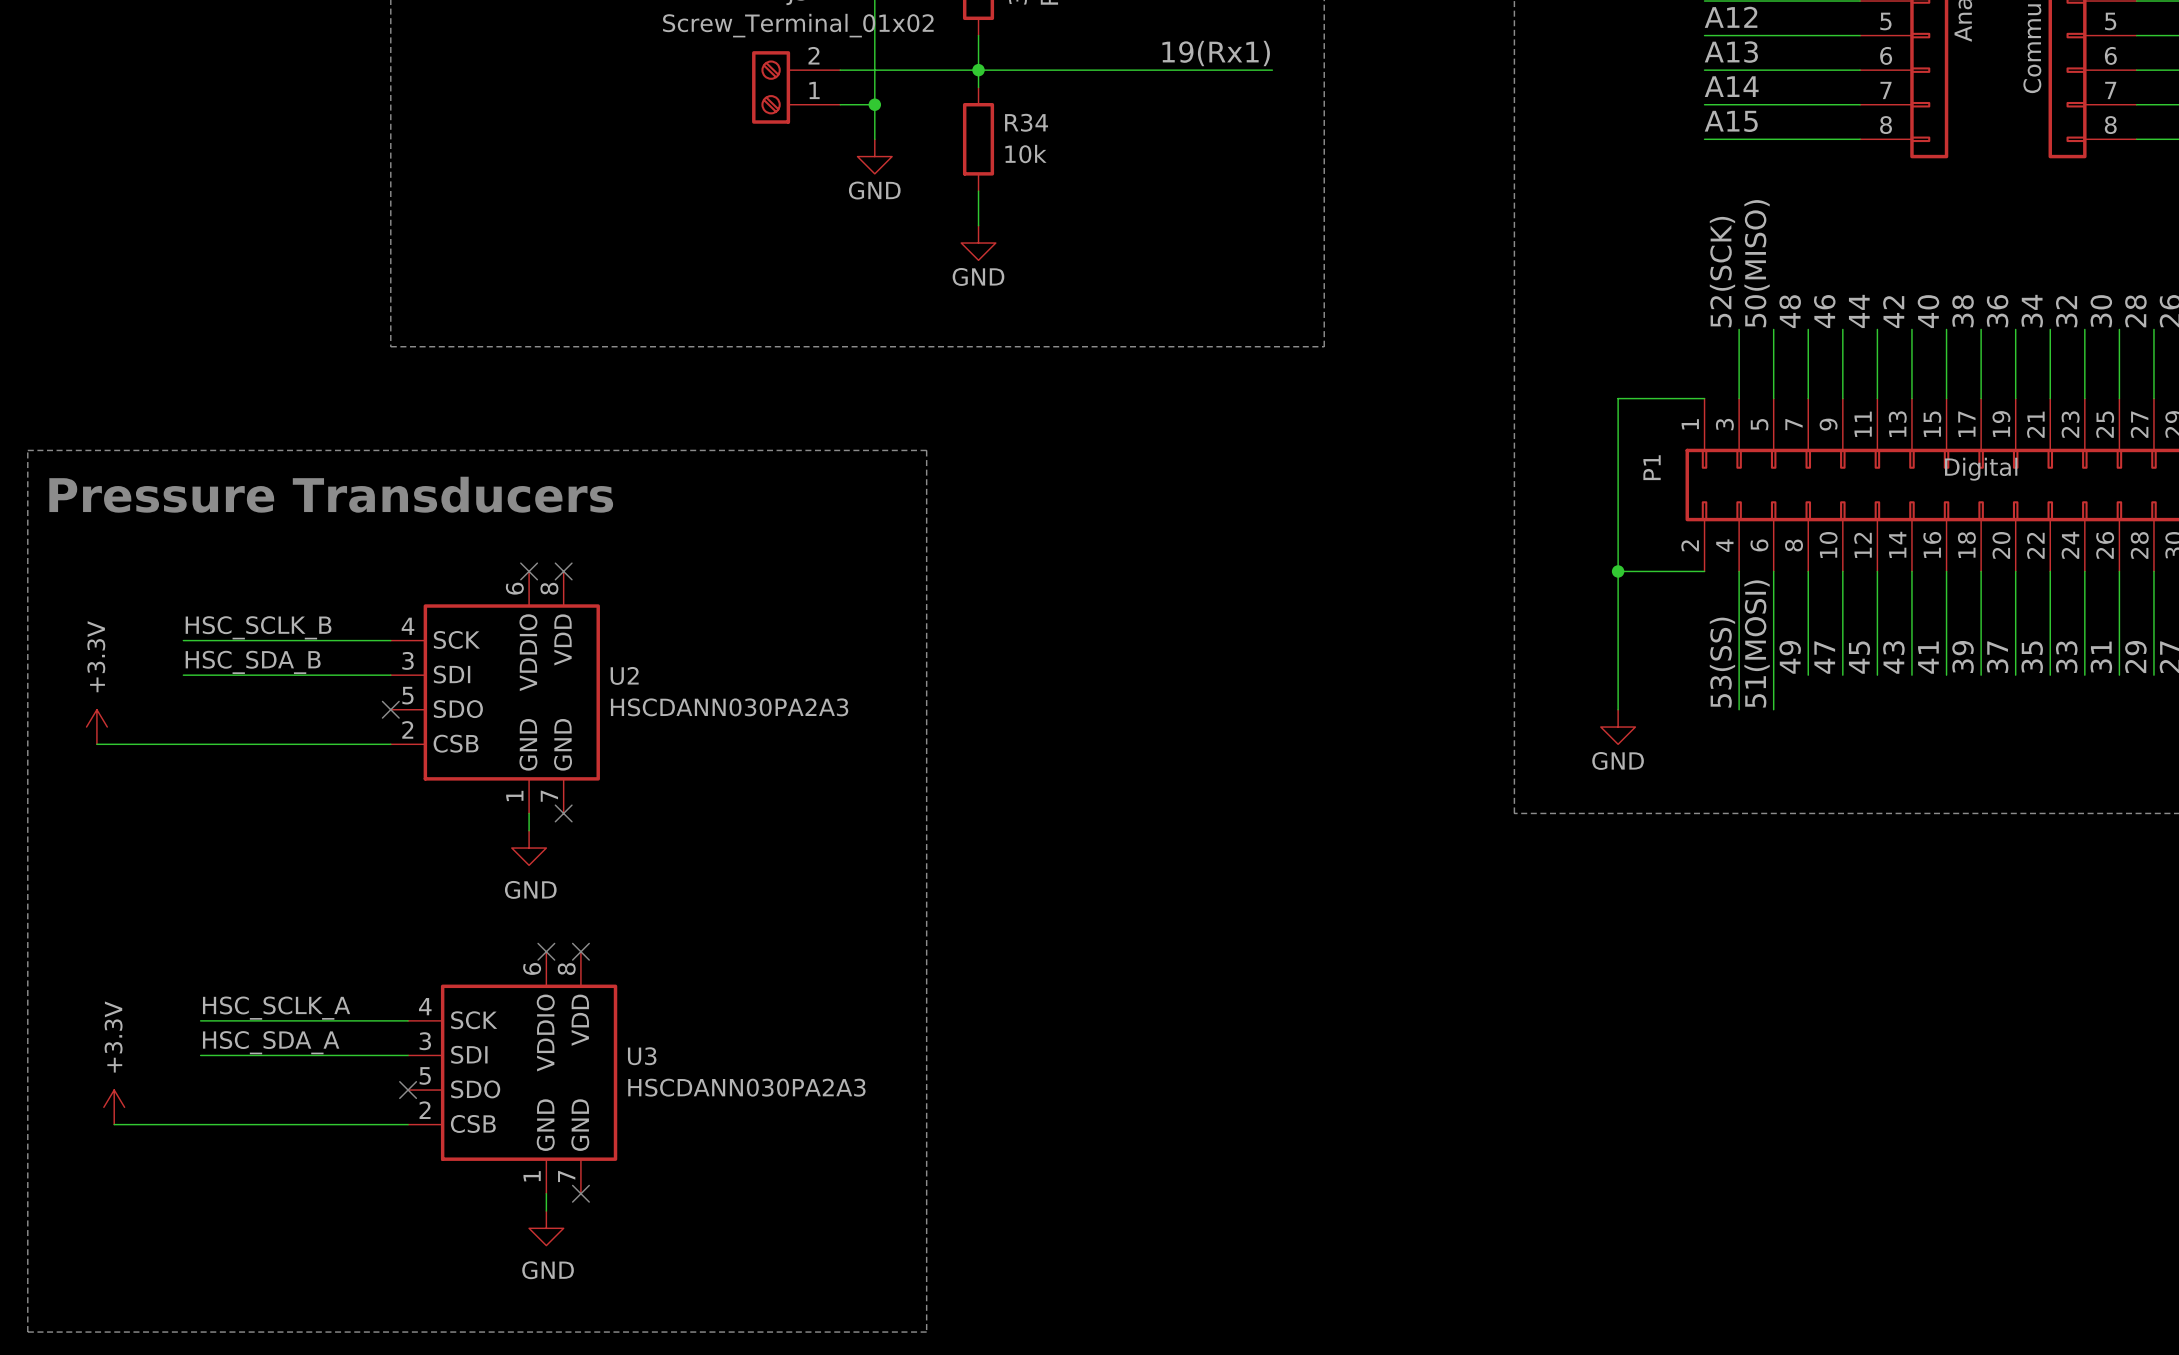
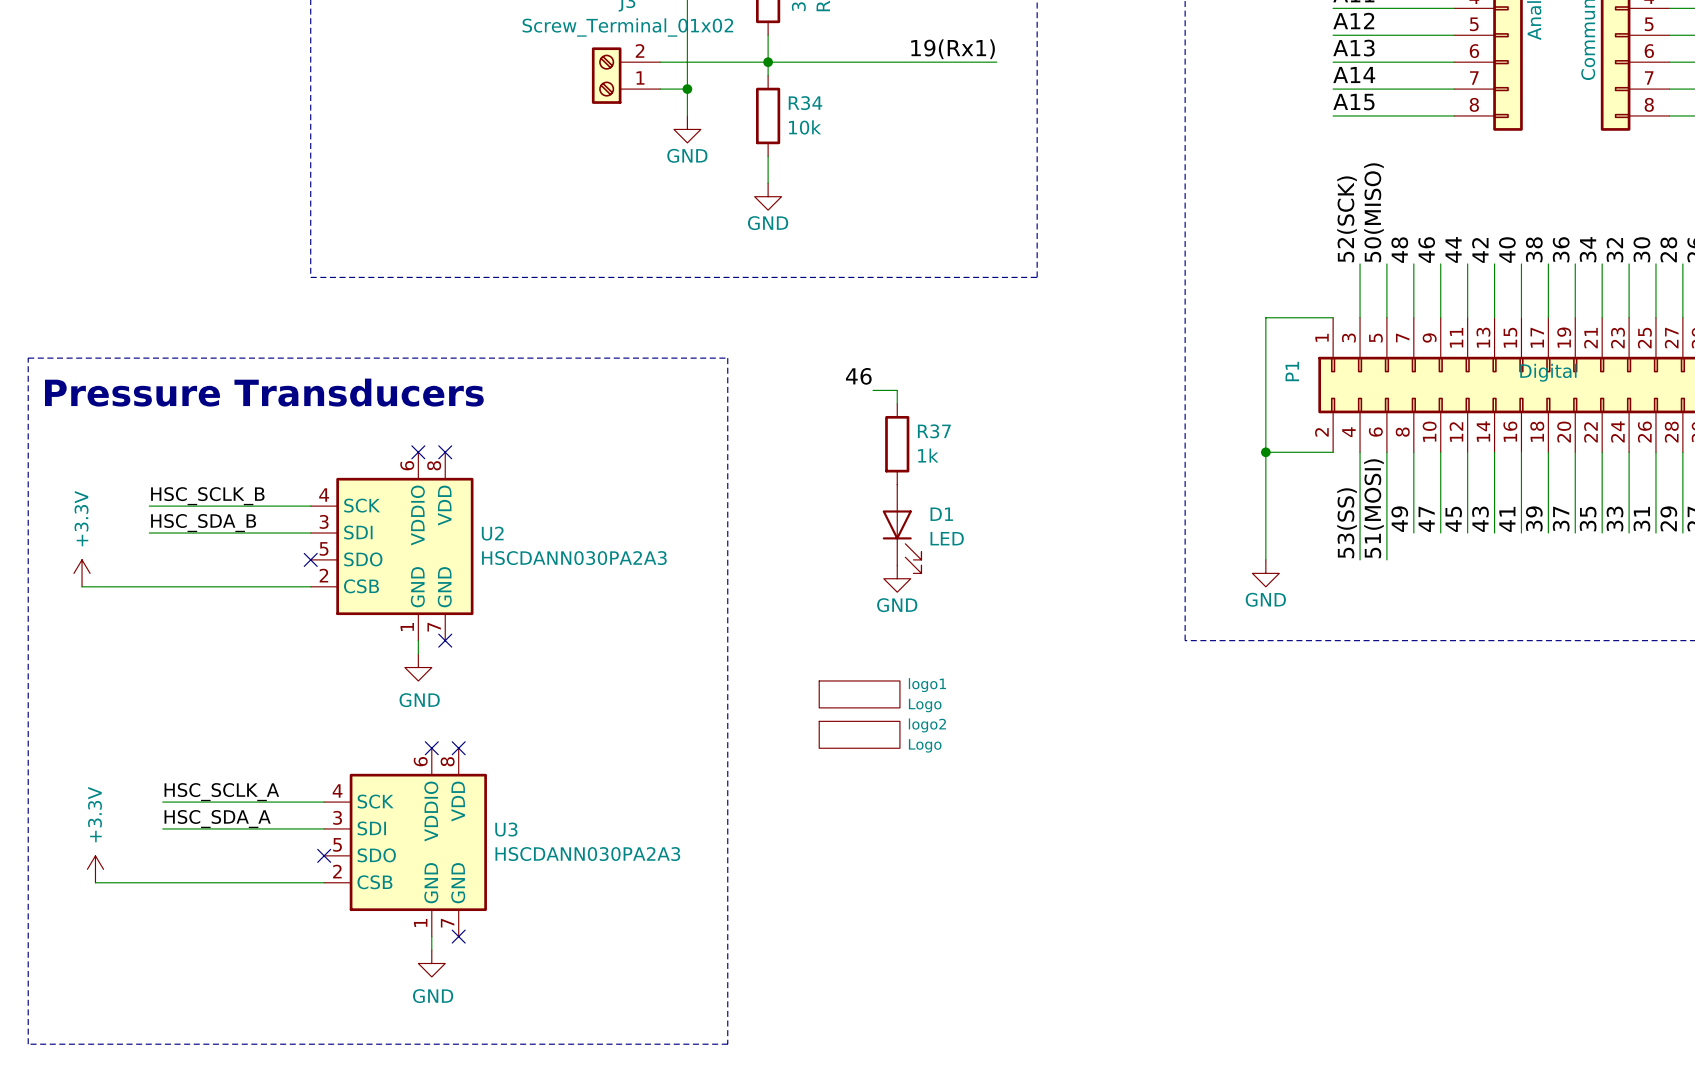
label: none -> 46 (858, 376)
wire: none -> (873, 390) (897, 390) (897, 403)
R37: none -> 1k (897, 444)
D1: none -> LED (902, 528)
power symbol: none -> GND (897, 578)
logo1: none -> Logo (859, 694)
logo2: none -> Logo (859, 734)

